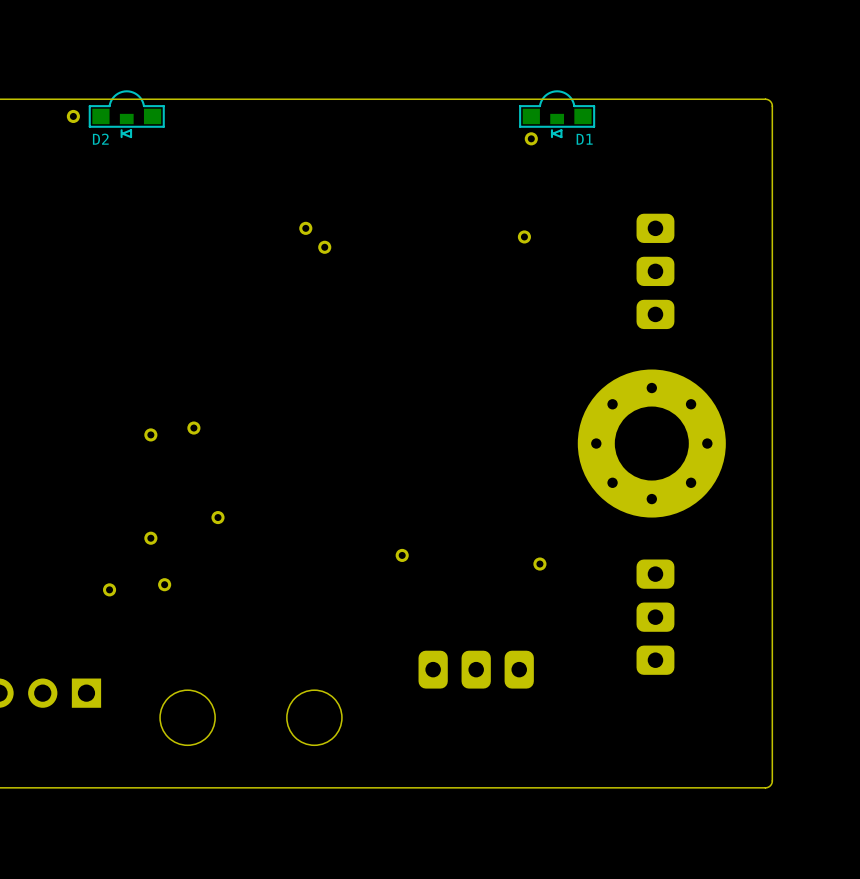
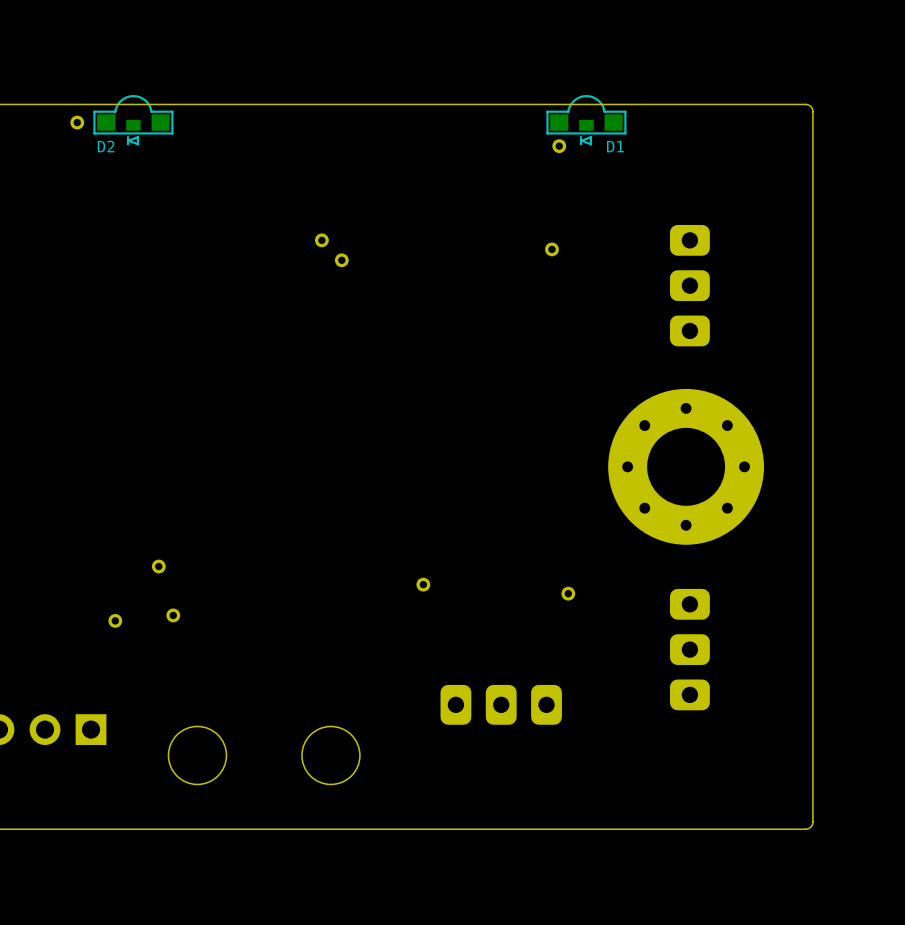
part: (193, 428) -> none
part: (150, 434) -> none
part: (218, 517) -> none

